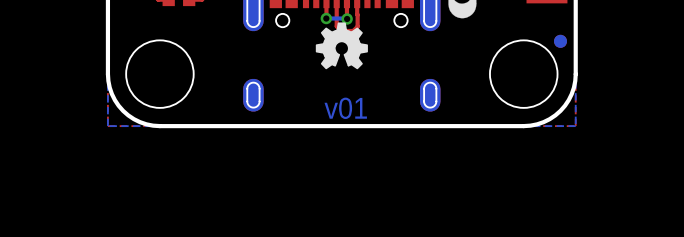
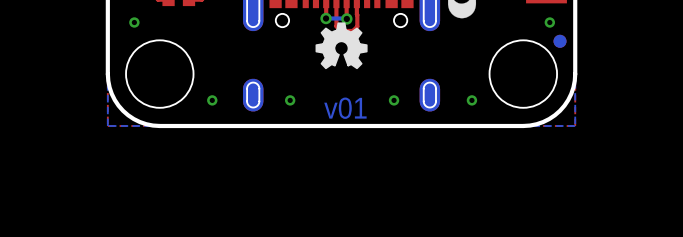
via: none -> (134, 22)
via: none -> (549, 22)
via: none -> (212, 100)
via: none -> (290, 100)
via: none -> (394, 100)
via: none -> (471, 100)

